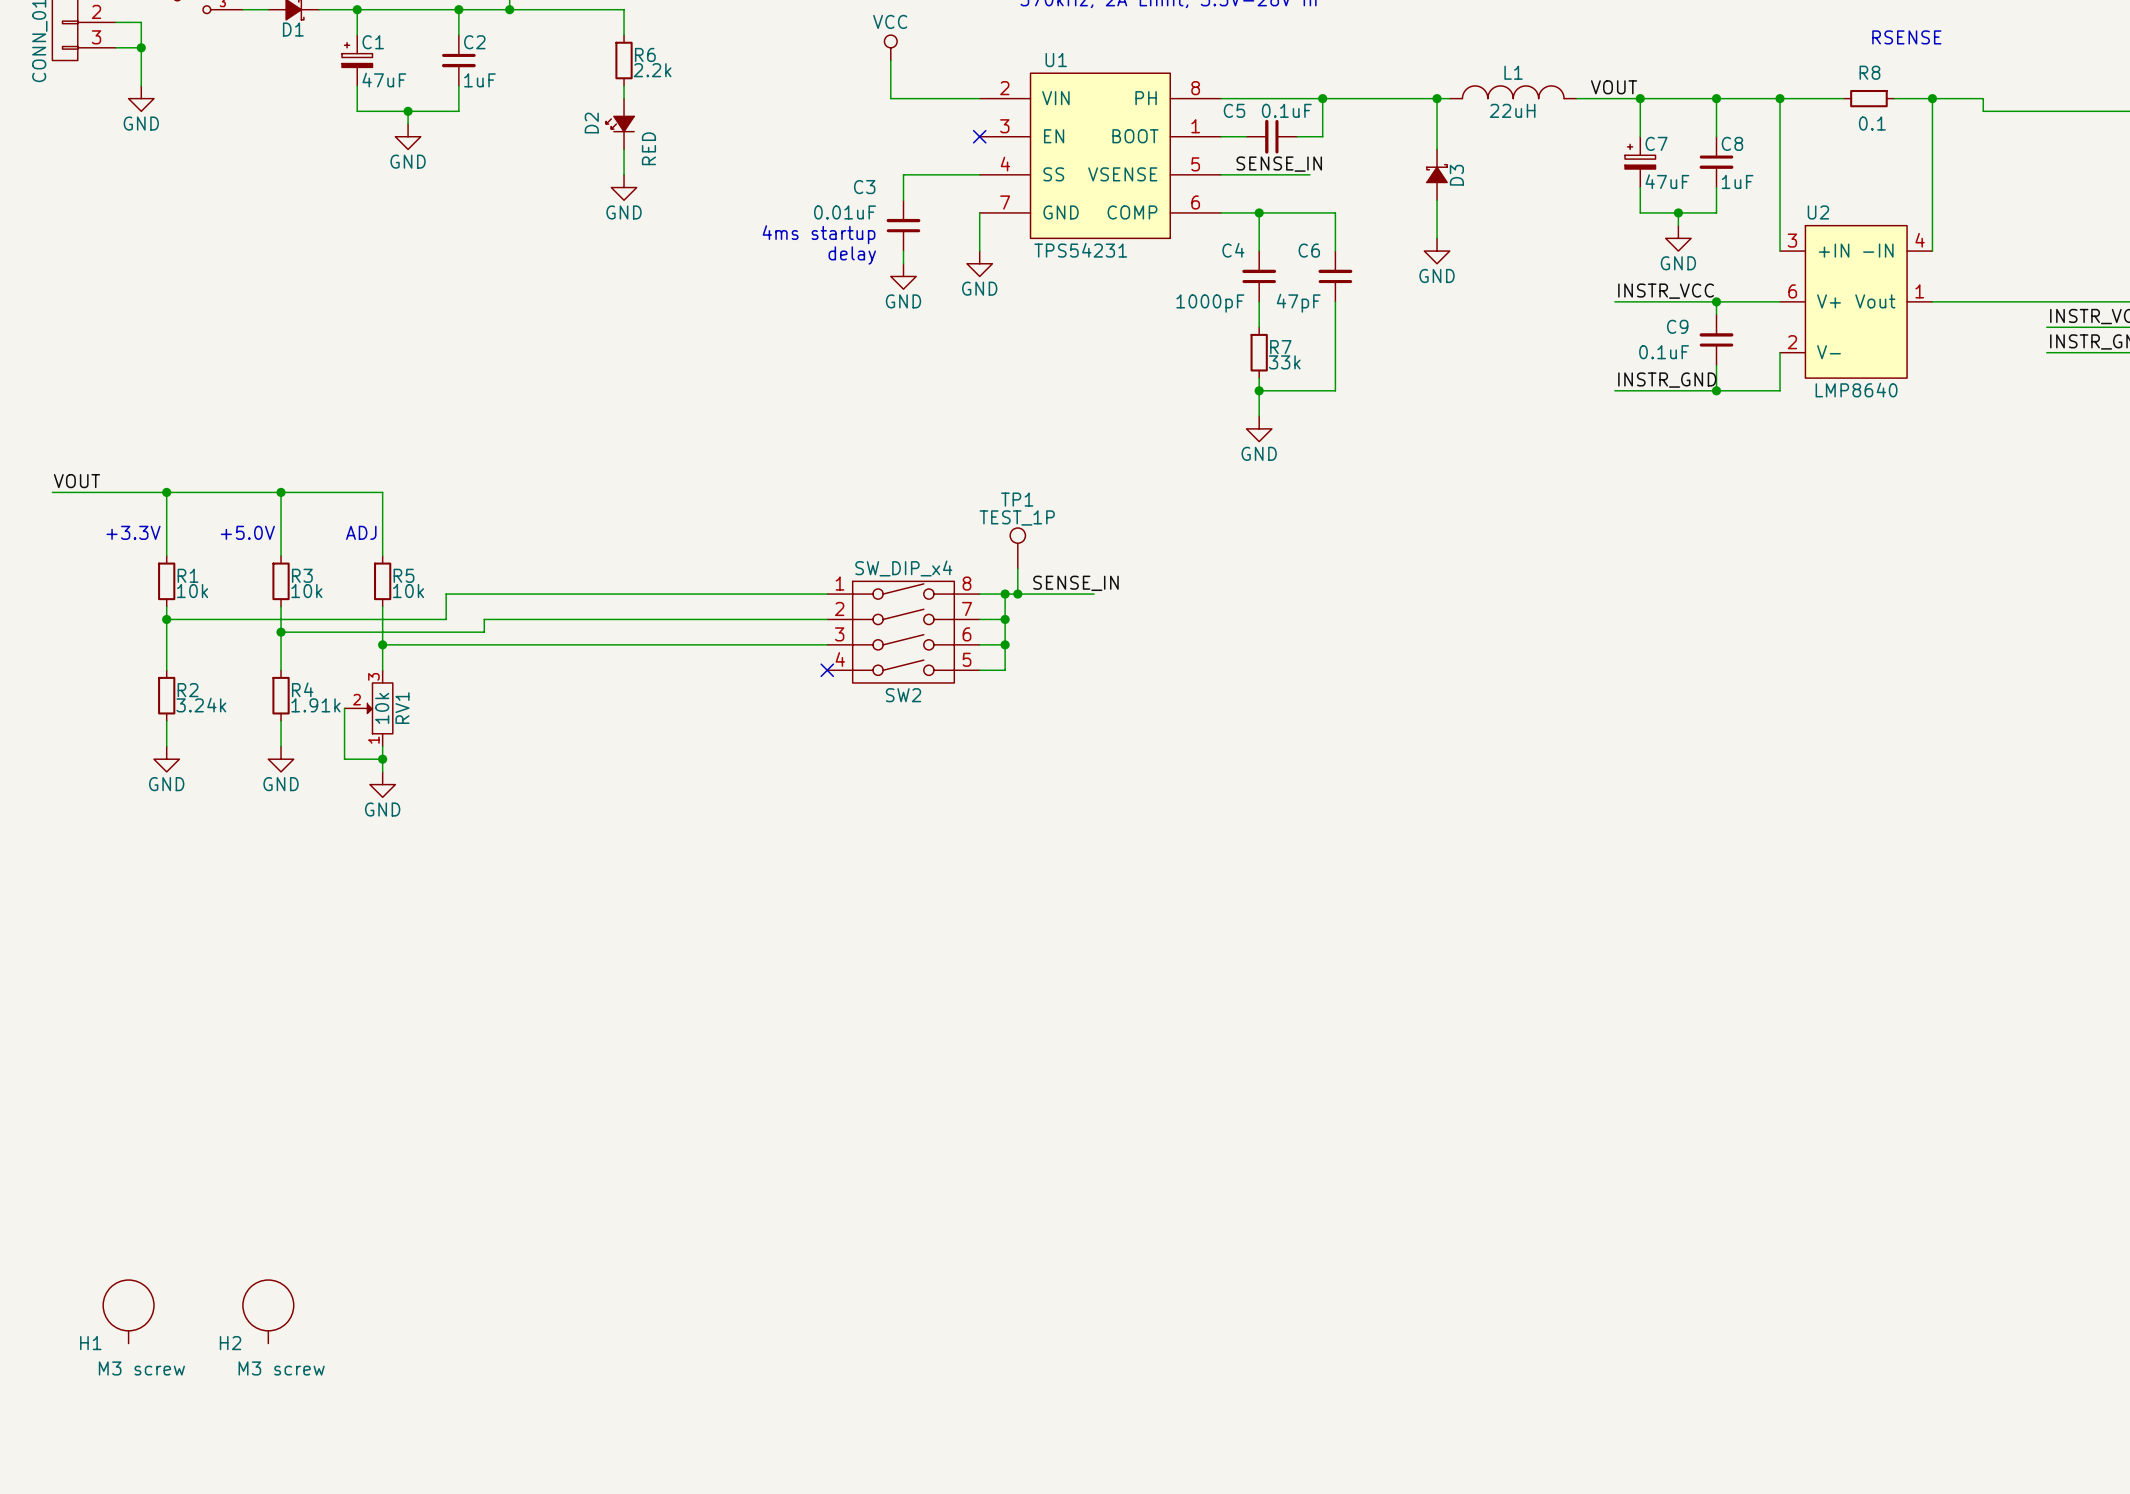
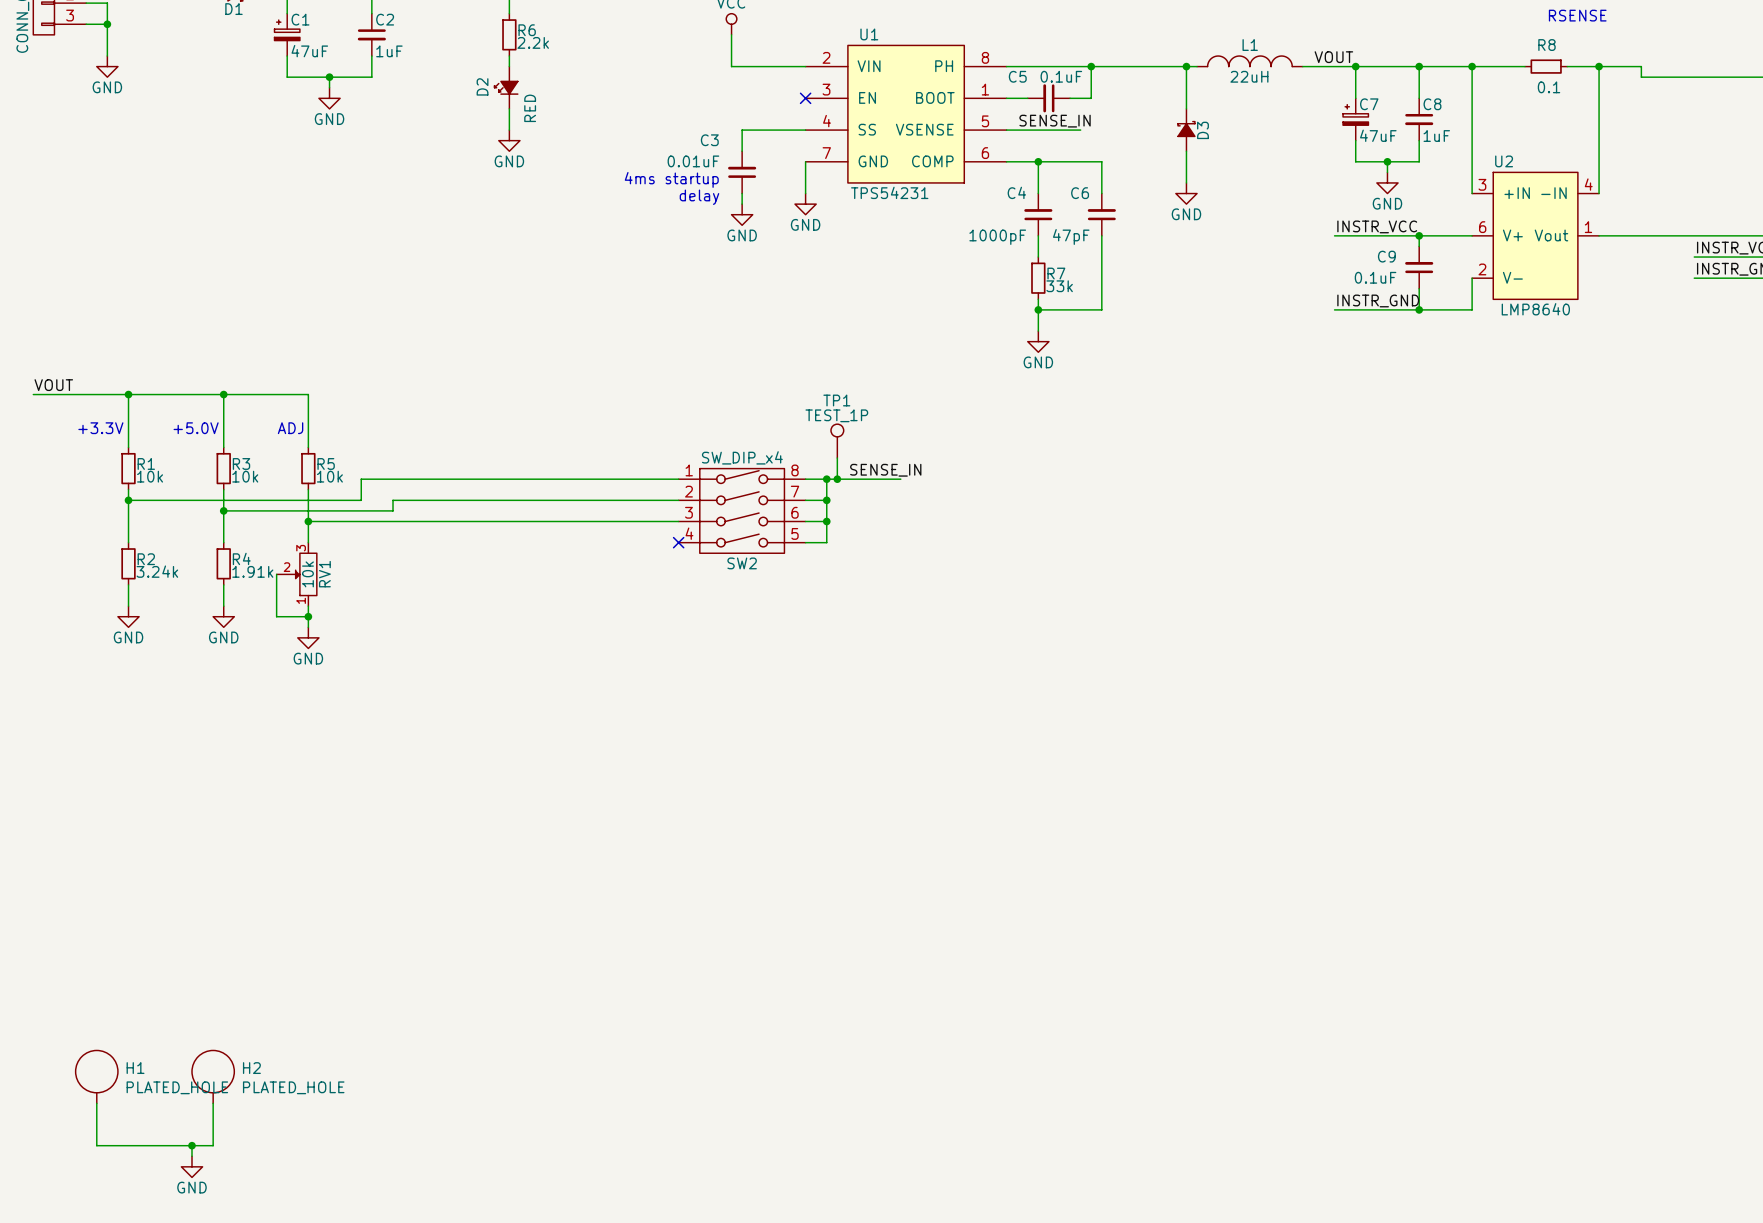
H1 name position: H1 (90, 1343) -> H1 (135, 1068)
wire: none -> (96, 1103) (96, 1145) (213, 1145) (213, 1103)
H2 name position: H2 (230, 1343) -> H2 (251, 1068)
H1 value: M3 screw (141, 1368) -> PLATED_HOLE (177, 1087)
H2 value: M3 screw (281, 1368) -> PLATED_HOLE (293, 1087)
wire: none -> (191, 1145) (191, 1156)
junction: none -> (191, 1145)
power symbol: none -> GND (191, 1166)

